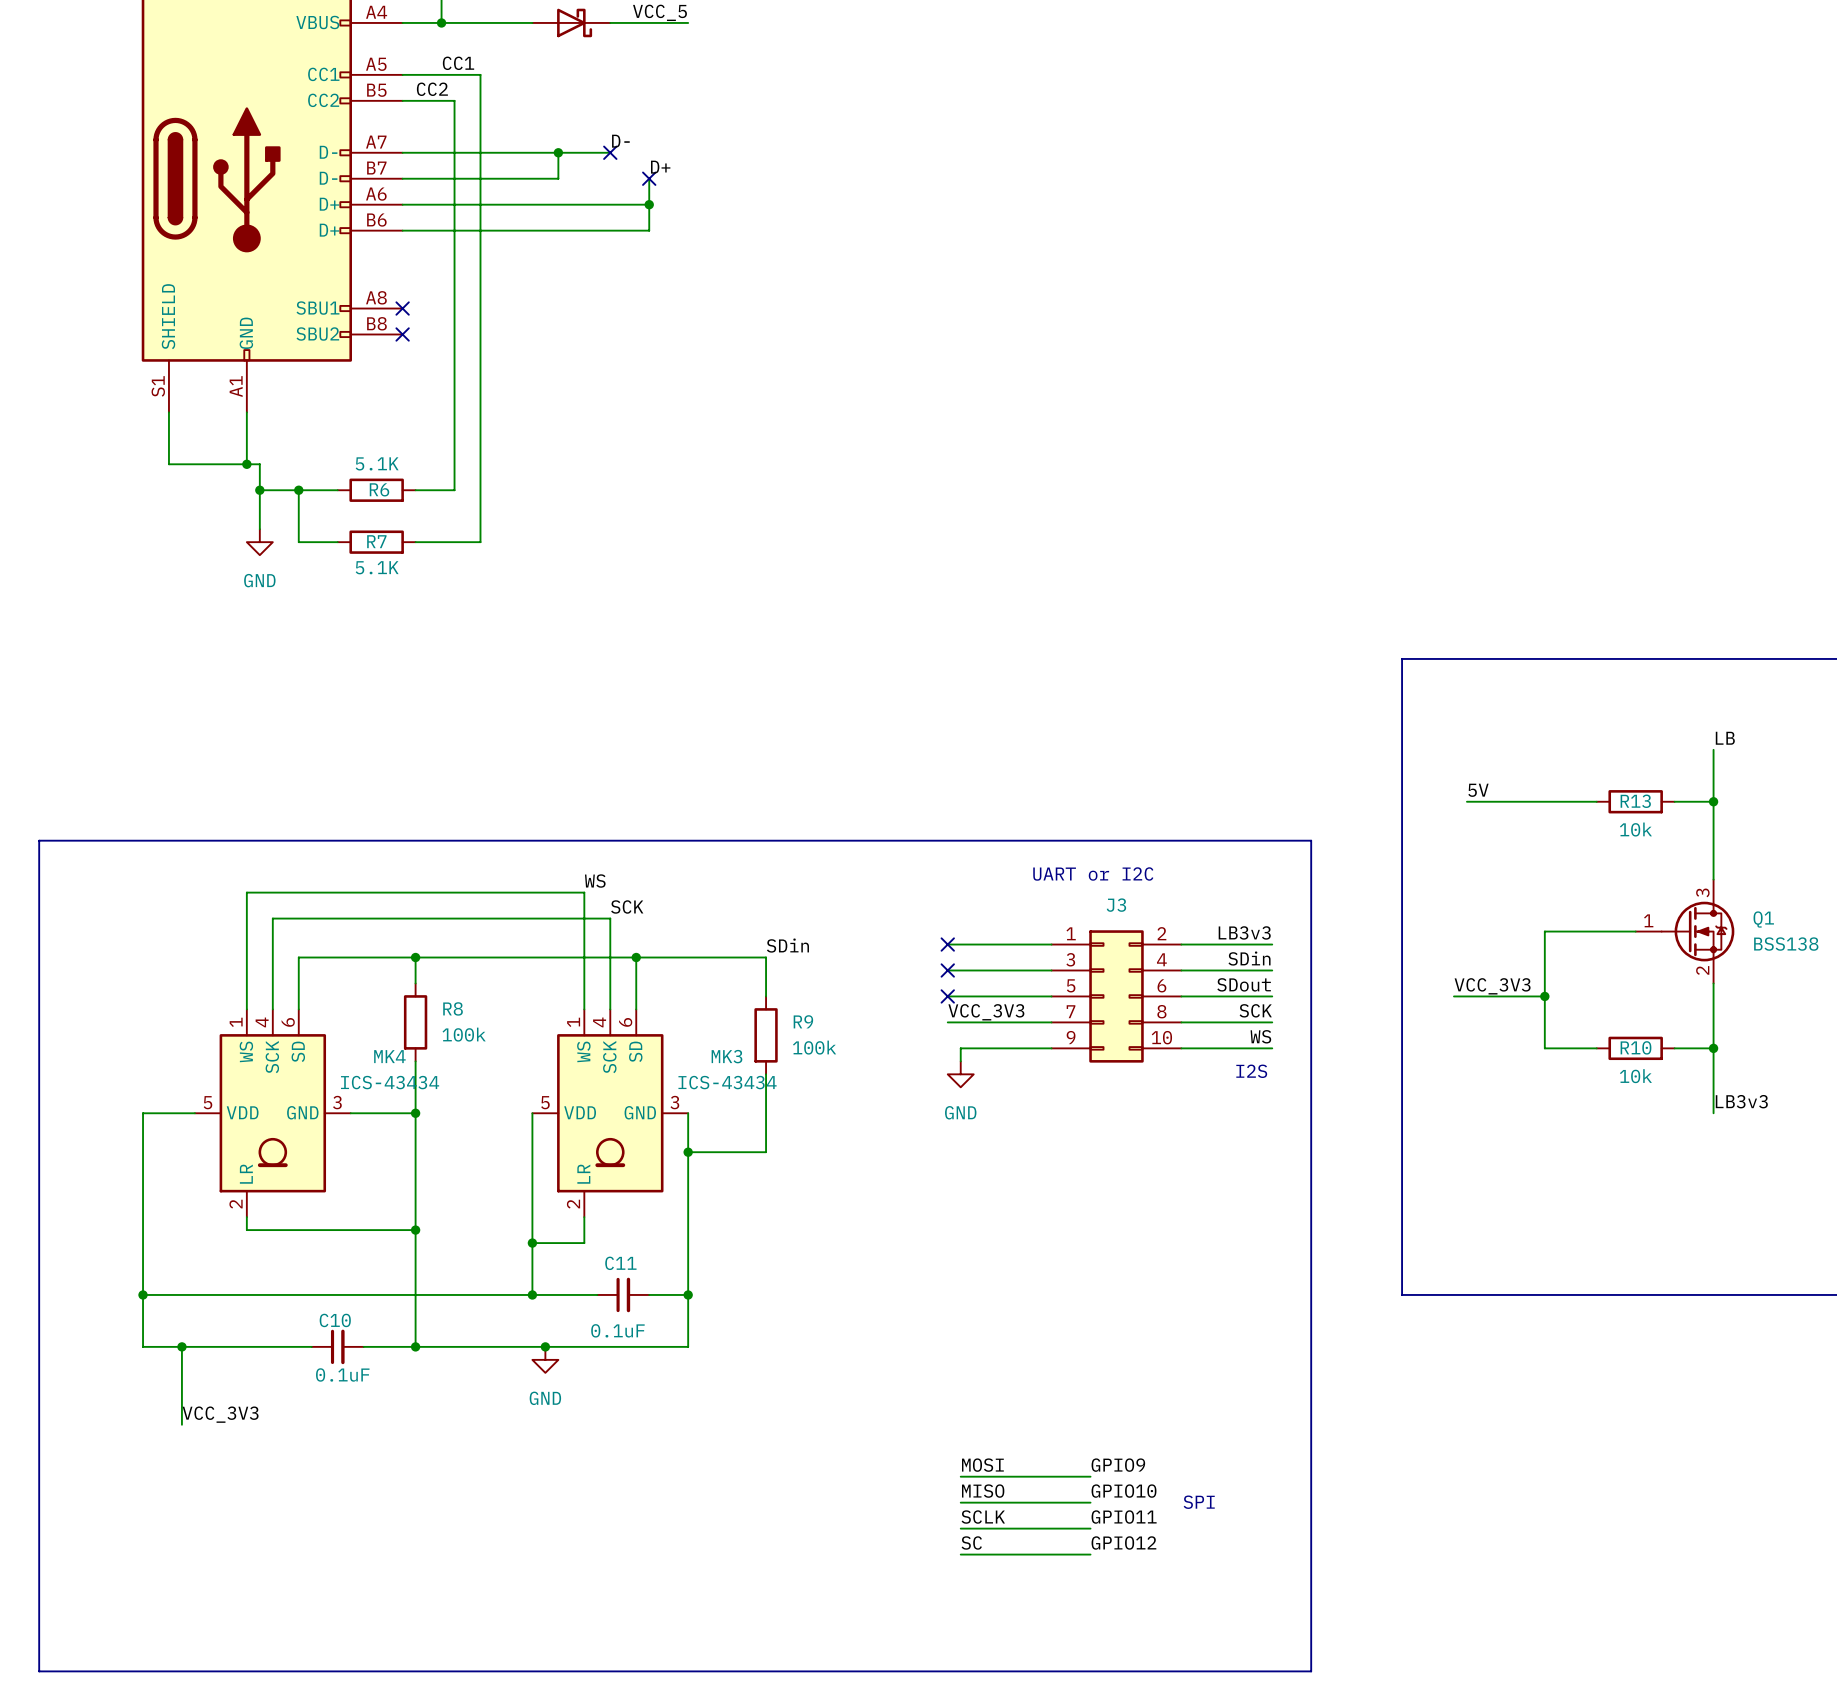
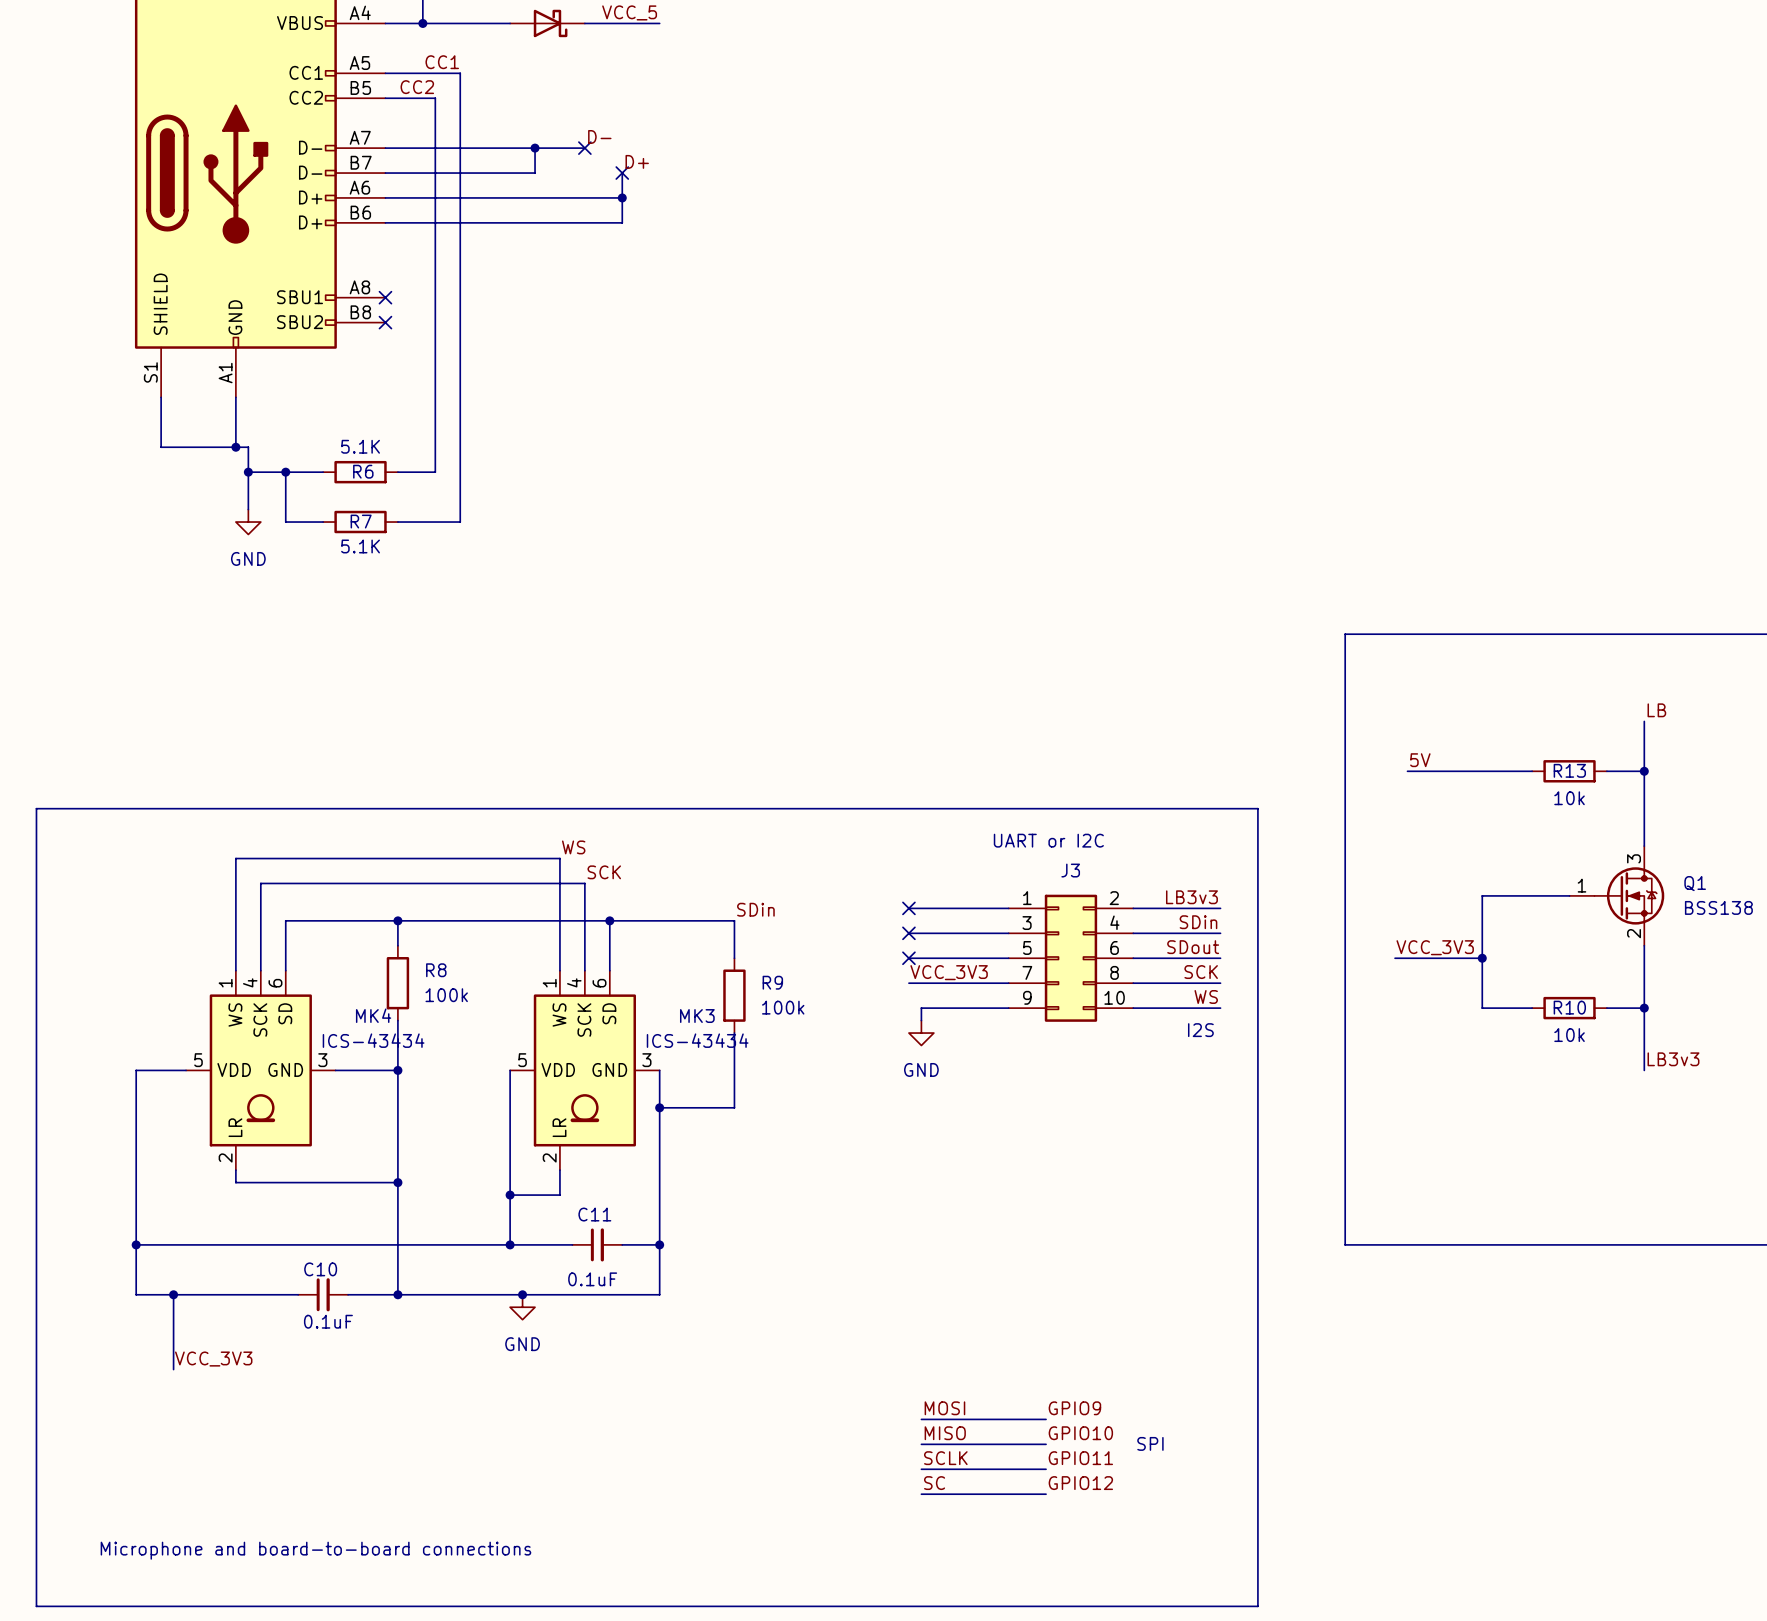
text: none -> Microphone and board-to-board connections (315, 1550)

